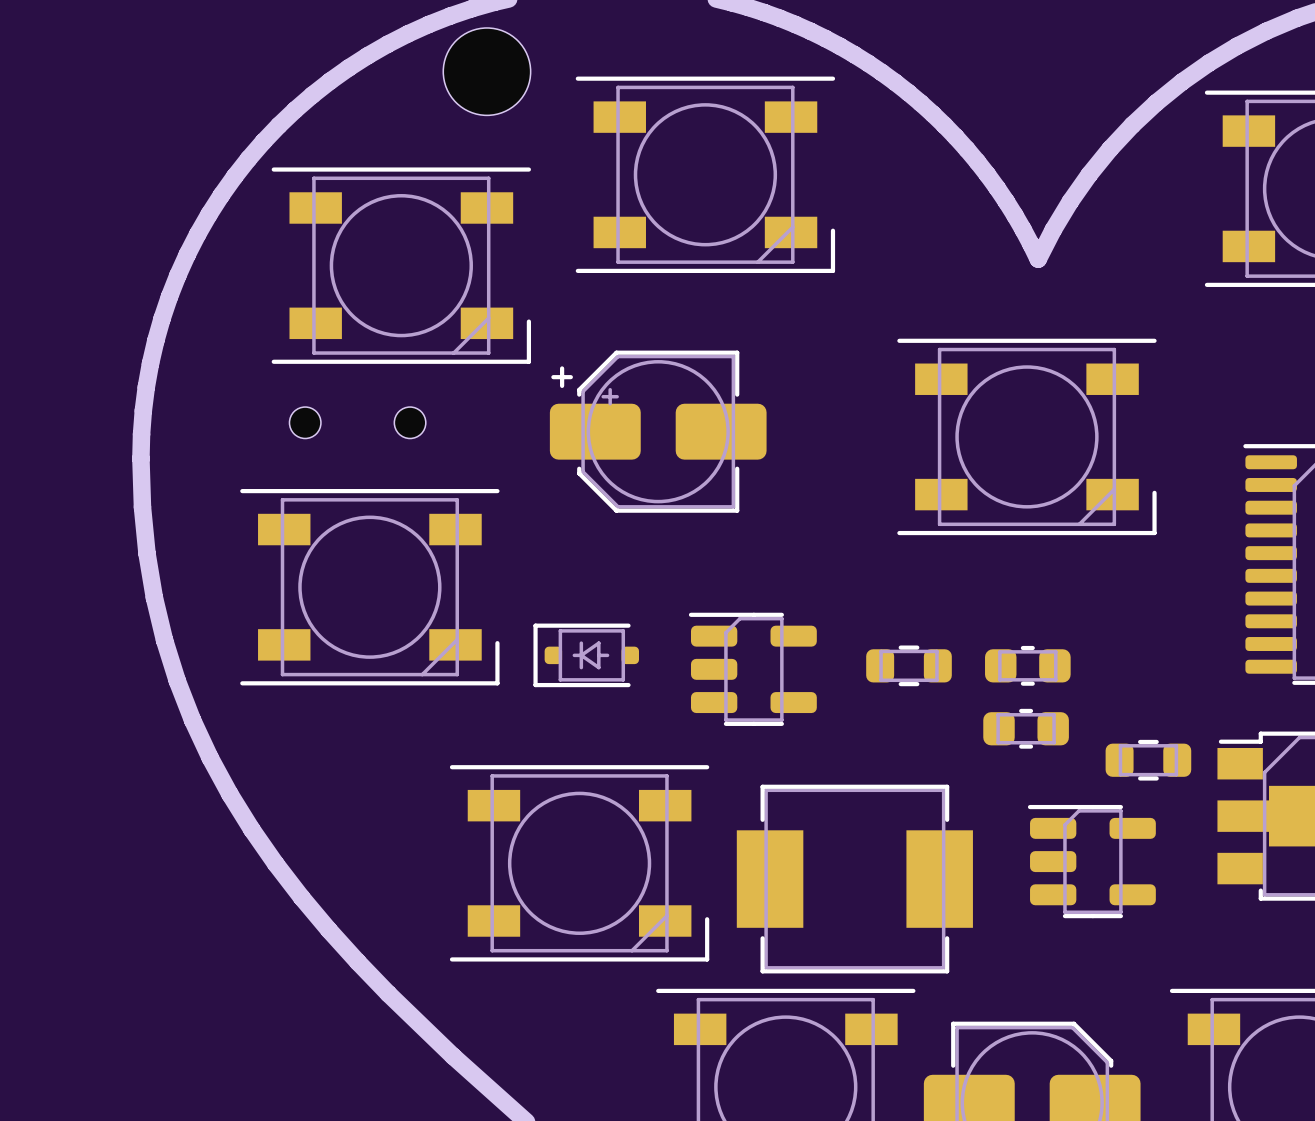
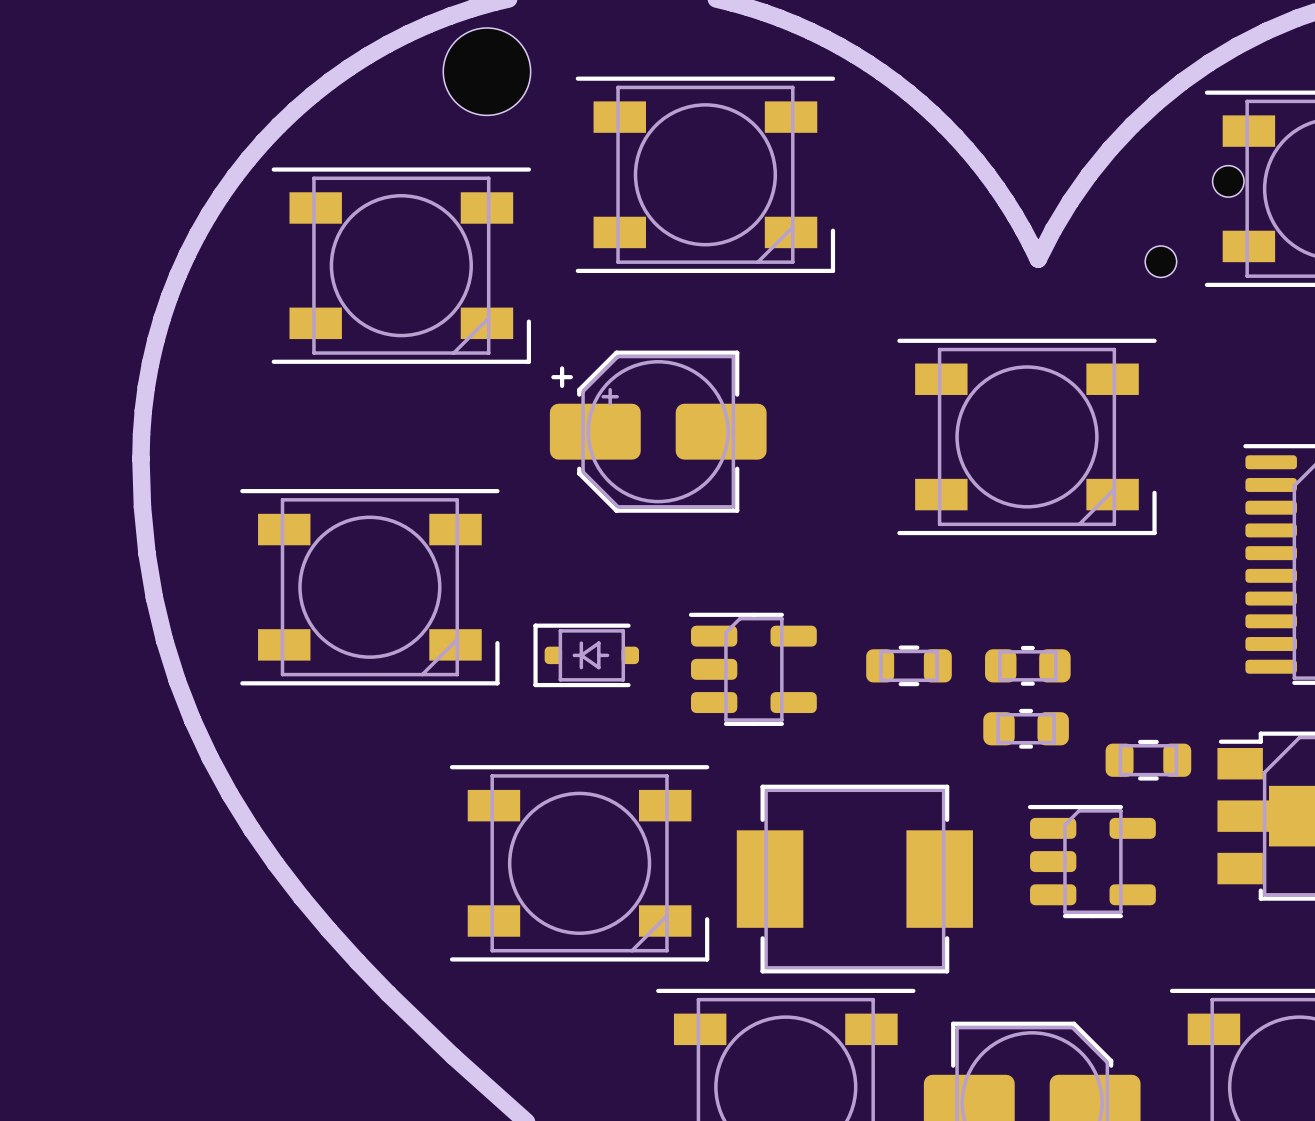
part: none -> (1194, 221)
part: (357, 422) -> none

